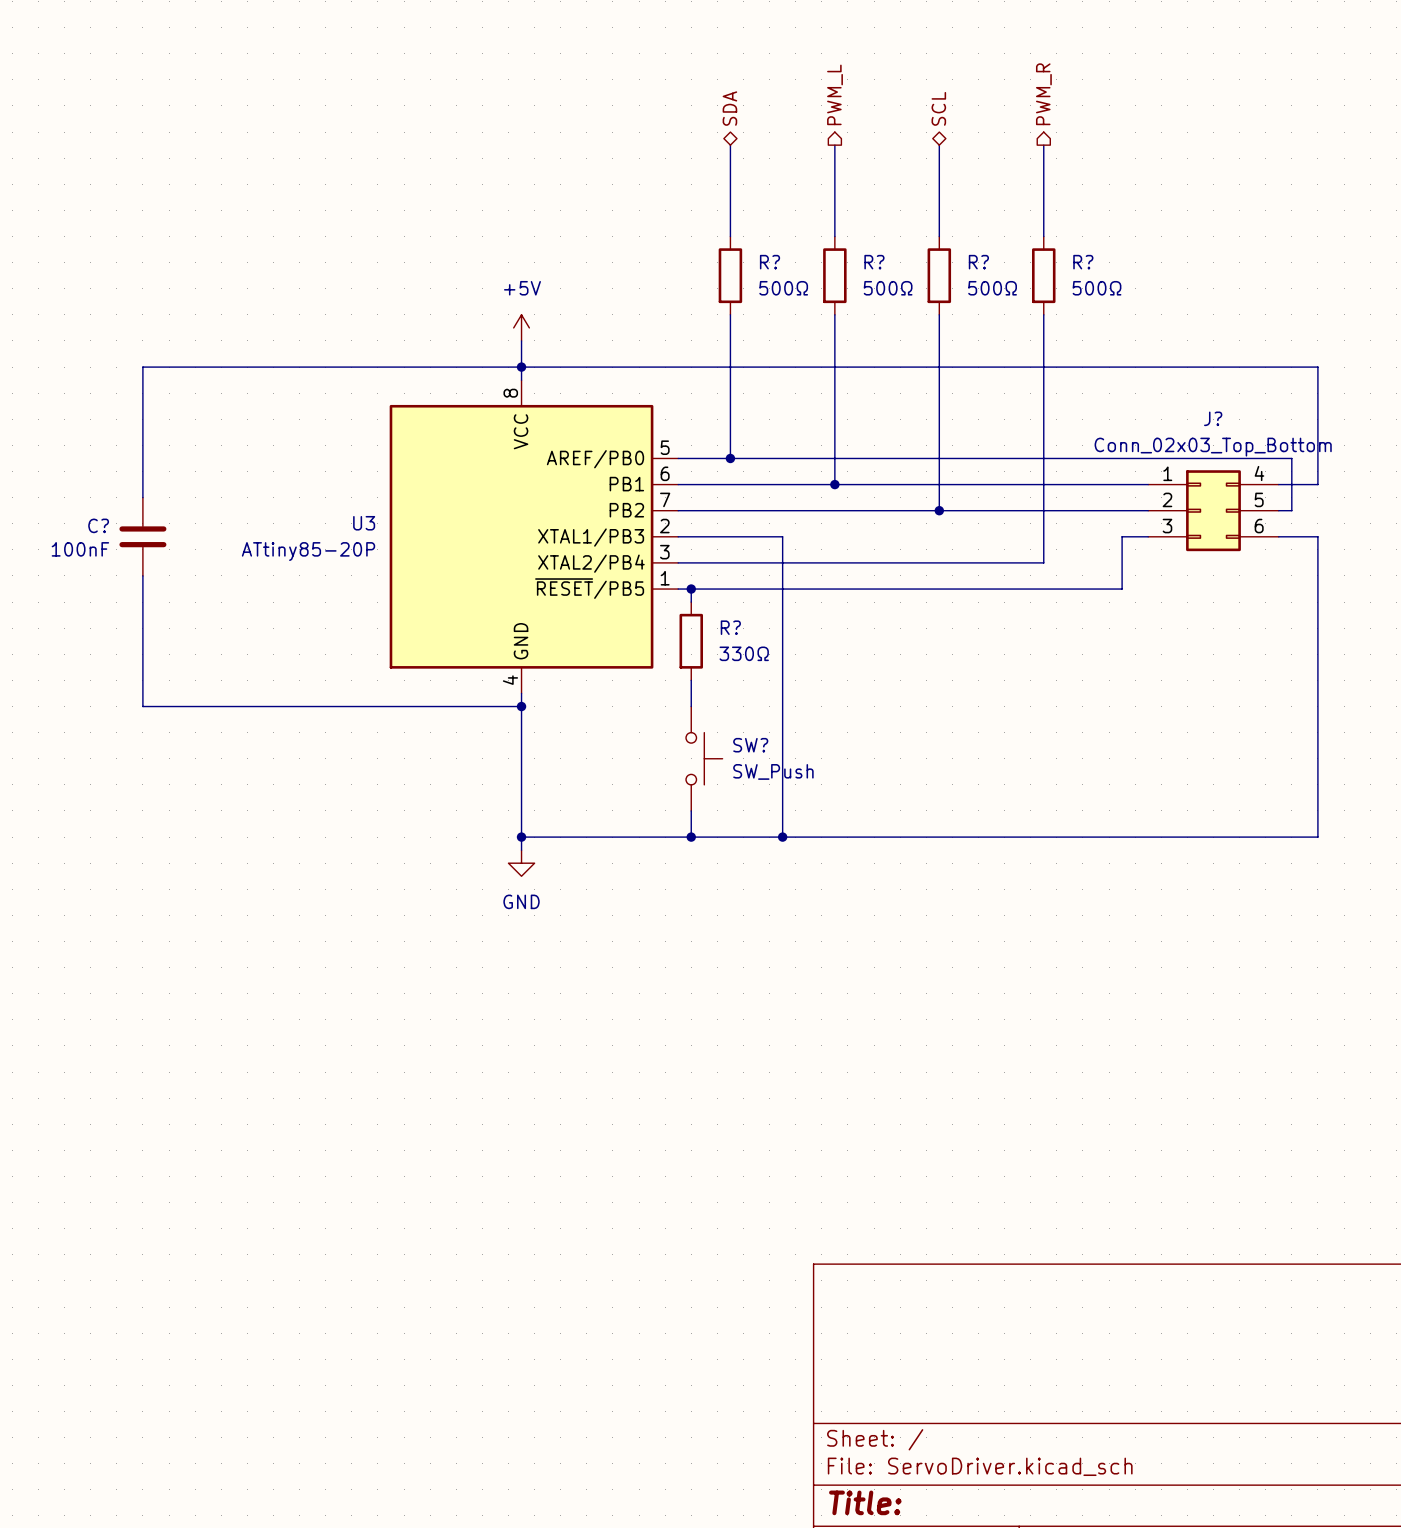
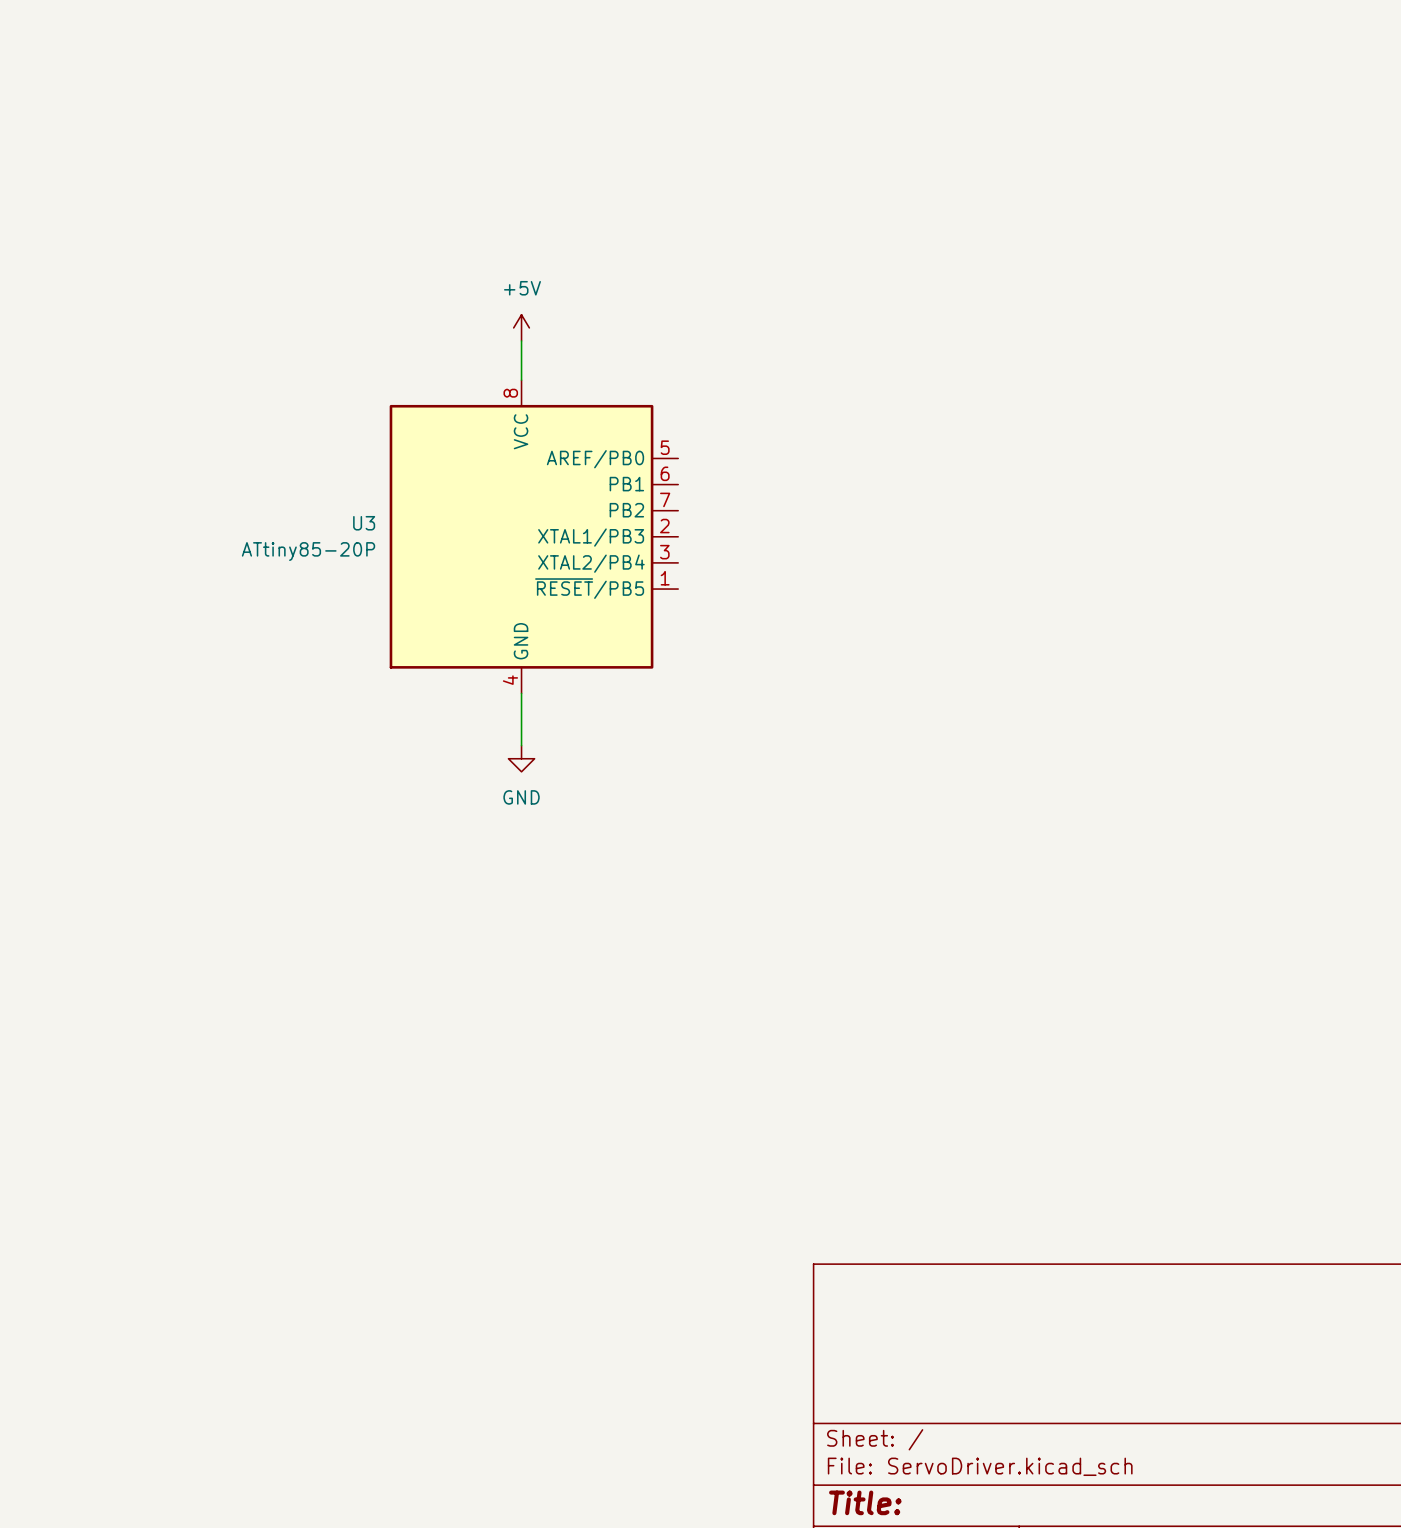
hierarchical label: PWM_L (835, 94) -> none
hierarchical label: PWM_R (1043, 94) -> none
hierarchical label: SDA (729, 108) -> none
hierarchical label: SCL (938, 108) -> none
wire: (730, 145) (730, 236) -> none
wire: (834, 145) (834, 236) -> none
wire: (939, 145) (939, 236) -> none
wire: (1043, 145) (1043, 236) -> none
R?: 500Ω (730, 275) -> none
R?: 500Ω (834, 275) -> none
R?: 500Ω (939, 275) -> none
R?: 500Ω (1043, 275) -> none
wire: (730, 314) (730, 458) -> none
wire: (834, 314) (834, 484) -> none
wire: (939, 314) (939, 510) -> none
wire: (1043, 314) (1043, 562) (678, 562) -> none
junction: (521, 367) -> none
wire: (678, 458) (1291, 458) (1291, 510) (1278, 510) -> none
junction: (730, 458) -> none
wire: (678, 484) (1148, 484) -> none
junction: (834, 484) -> none
wire: (1278, 484) (1317, 484) (1317, 367) (142, 367) (142, 497) -> none
wire: (678, 510) (1148, 510) -> none
junction: (939, 510) -> none
J?: Conn_02x03_Top_Bottom (1213, 510) -> none
C?: 100nF (142, 536) -> none
wire: (678, 536) (782, 536) (782, 837) -> none
wire: (1148, 536) (1122, 536) (1122, 589) (678, 589) -> none
wire: (1278, 536) (1317, 536) (1317, 837) (521, 837) -> none
wire: (142, 575) (142, 706) (521, 706) -> none
wire: (691, 589) (691, 602) -> none
junction: (691, 589) -> none
R?: 330Ω (691, 641) -> none
wire: (691, 680) (691, 706) -> none
junction: (521, 706) -> none
wire: (521, 745) (521, 850) -> none
SW?: SW_Push (704, 758) -> none
wire: (691, 810) (691, 837) -> none
junction: (521, 837) -> none
junction: (691, 837) -> none
junction: (782, 837) -> none
power symbol position: GND (521, 863) -> GND (521, 758)

